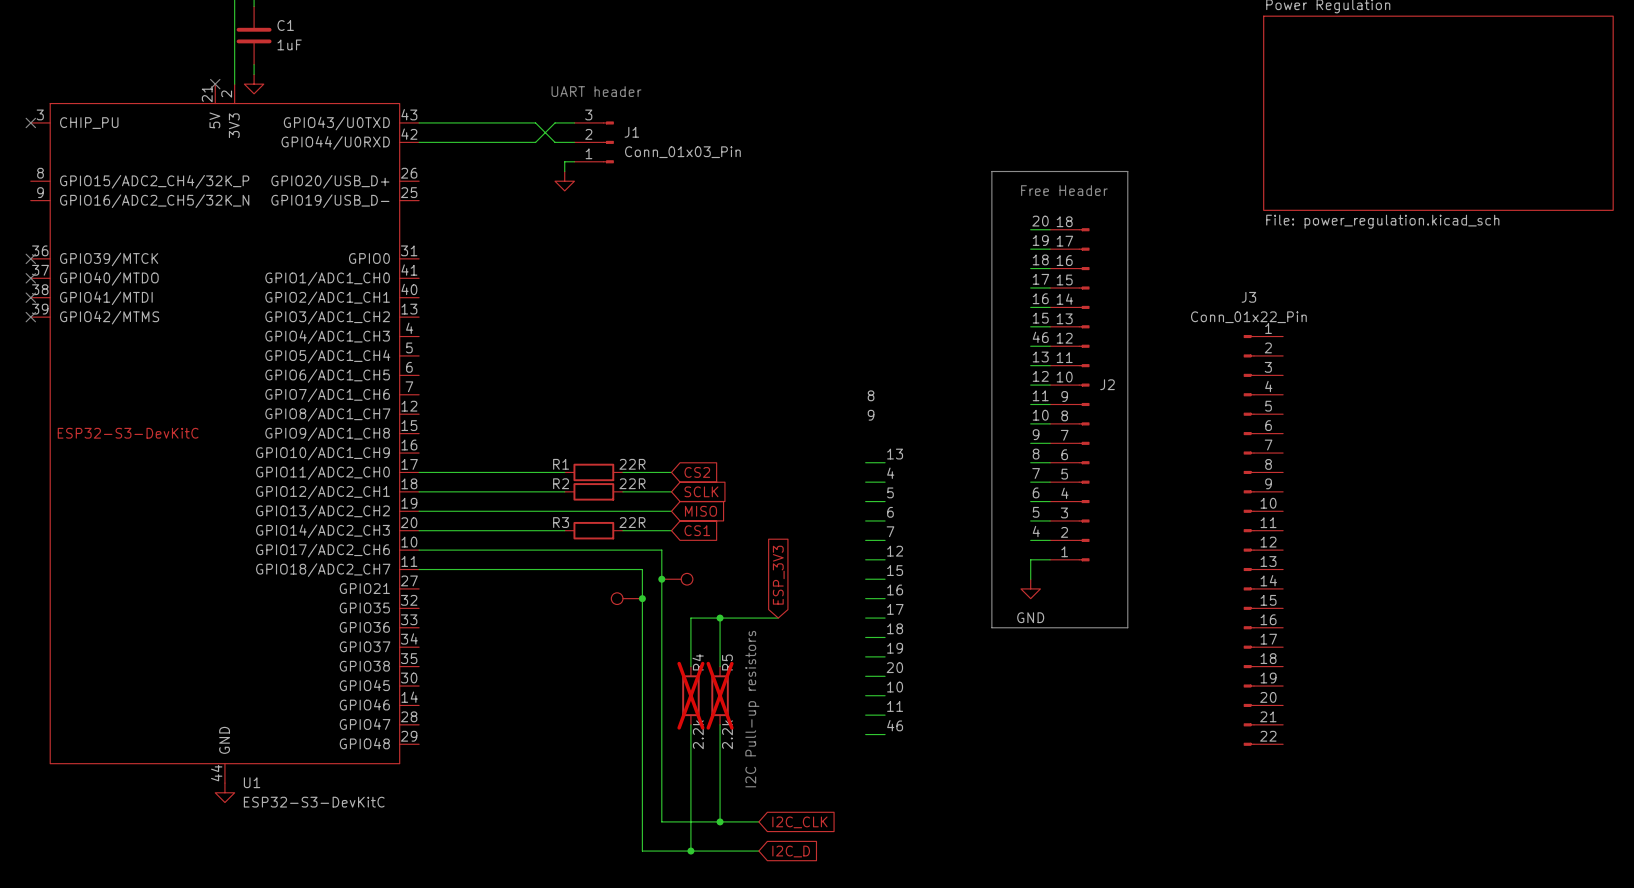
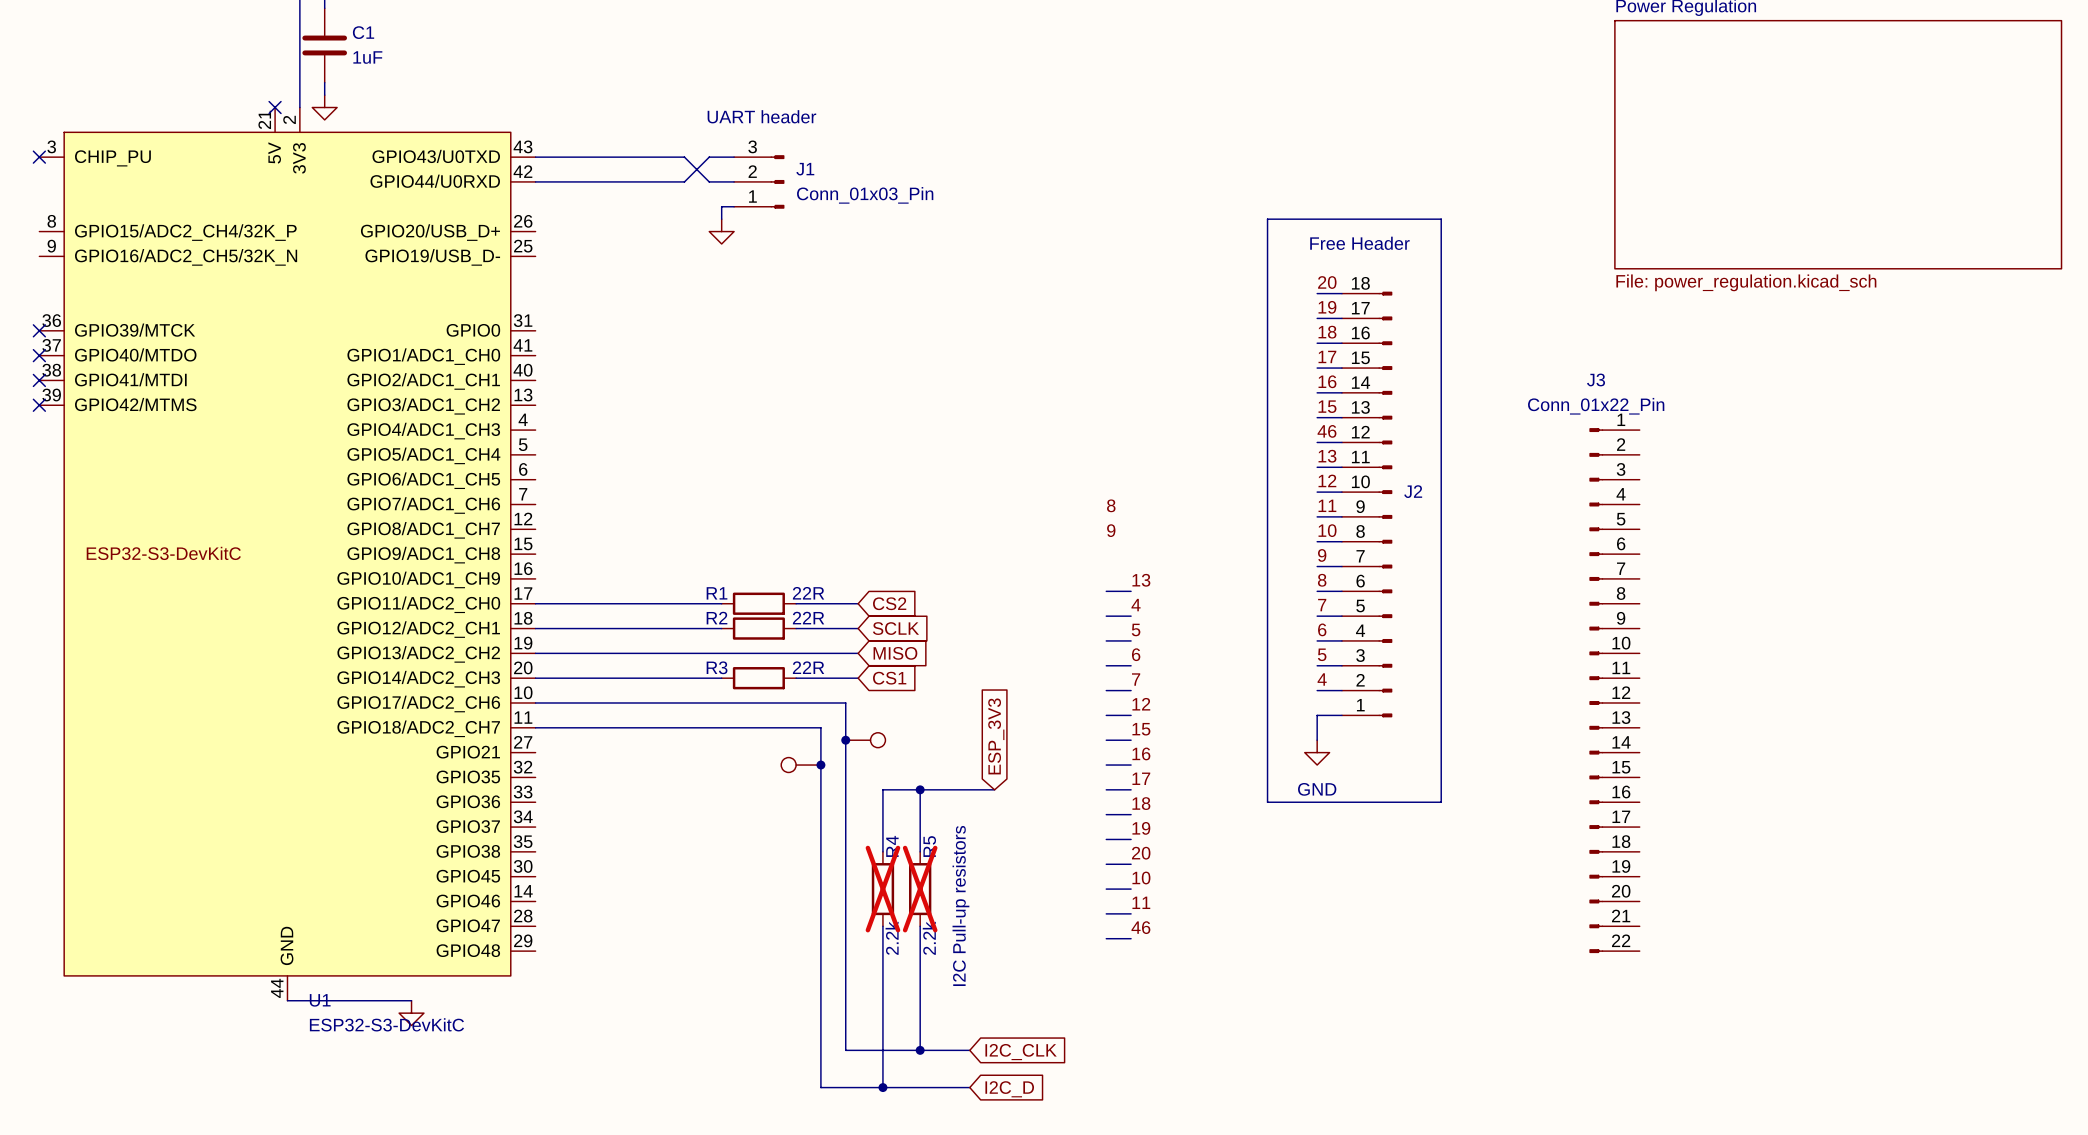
wire: none -> (287, 1000) (411, 1000)
power symbol position: (224, 792) -> (411, 1013)

